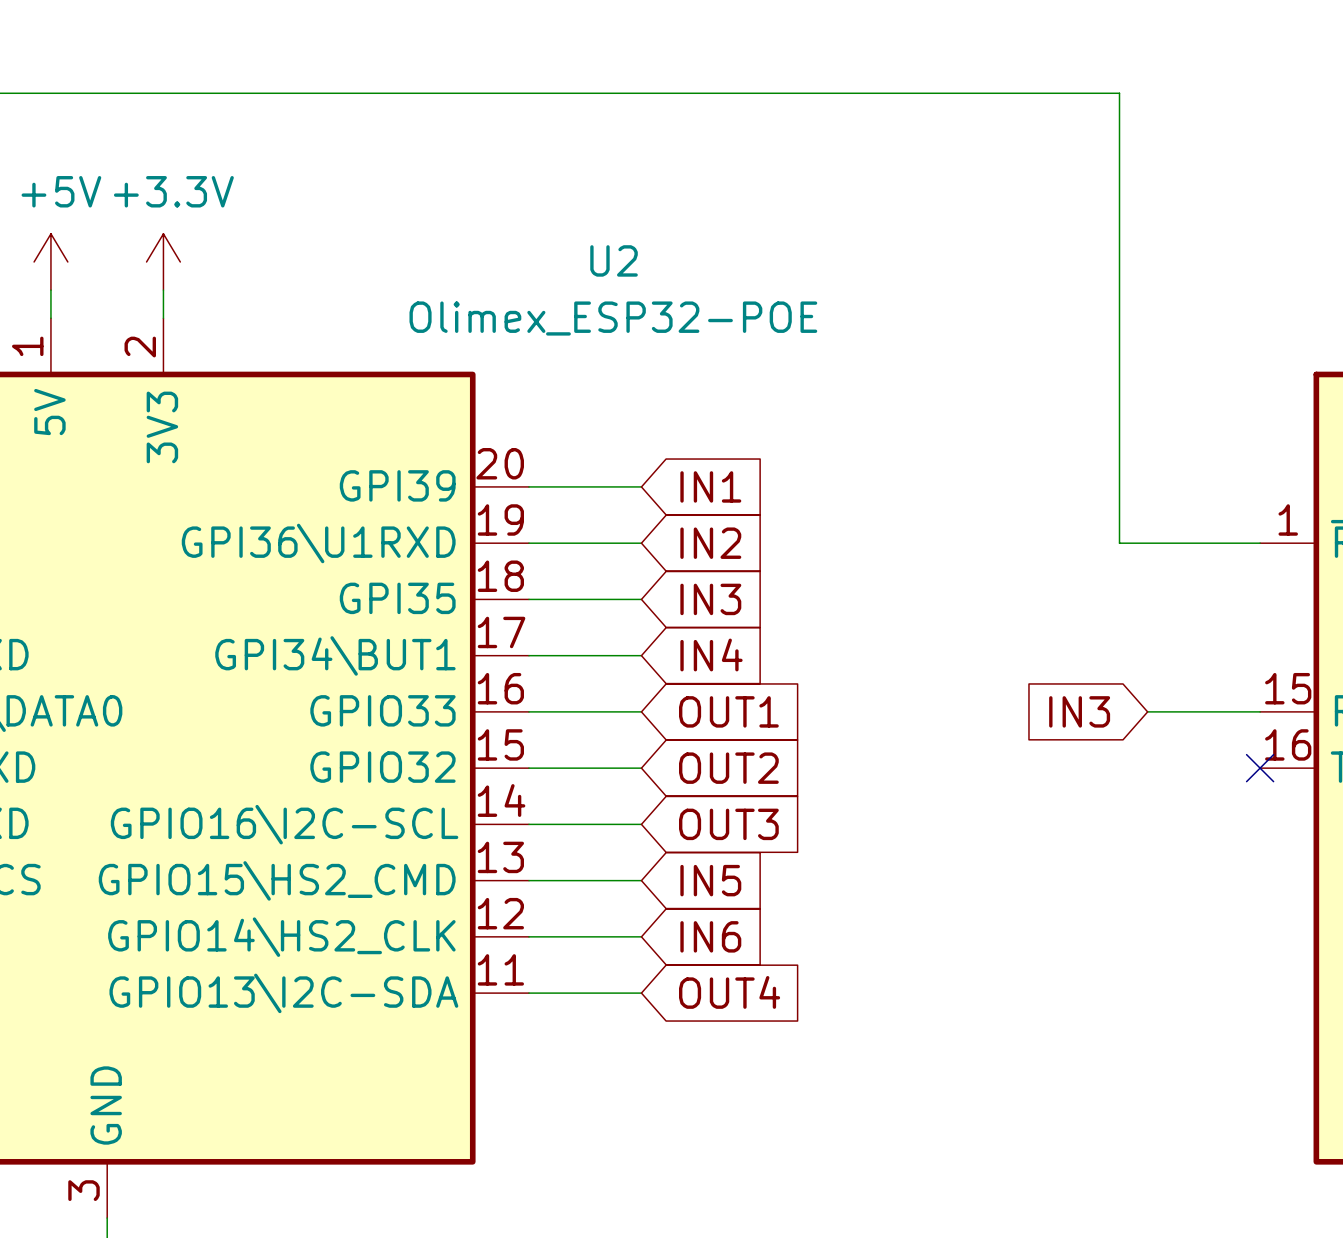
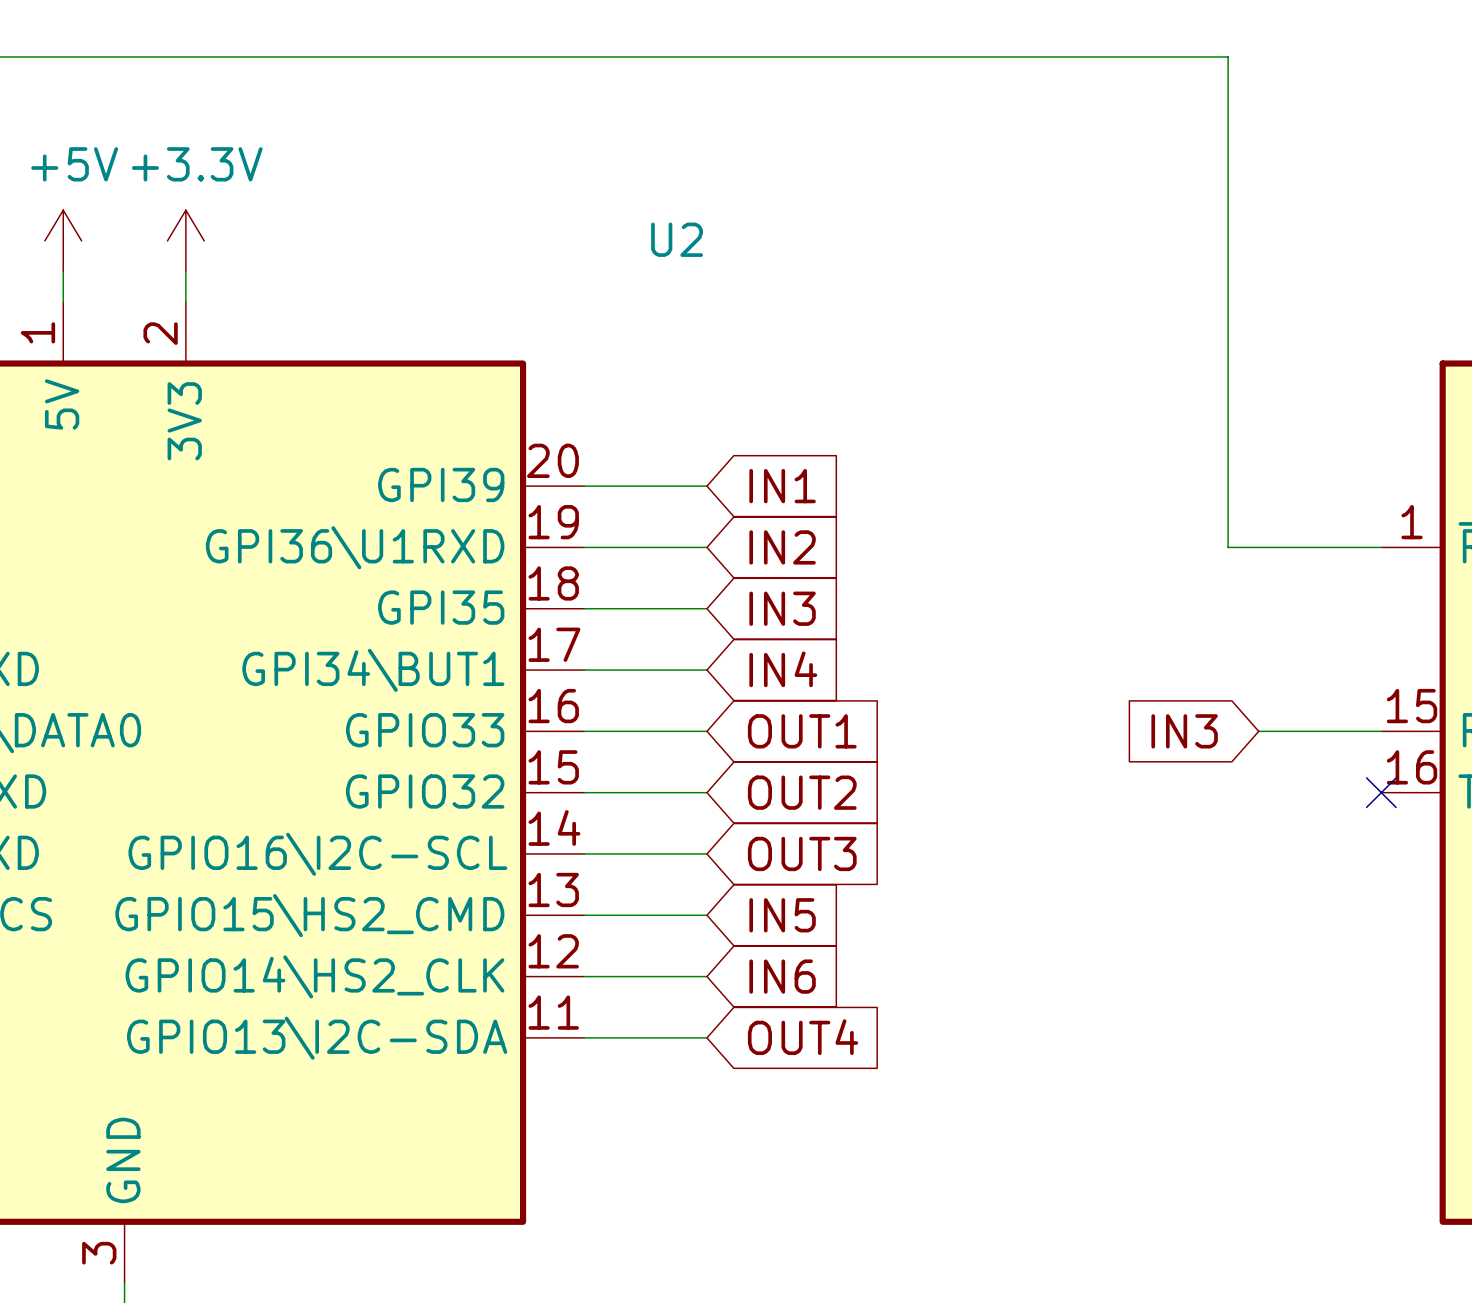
U2 value: Olimex_ESP32-POE (613, 318) -> none

